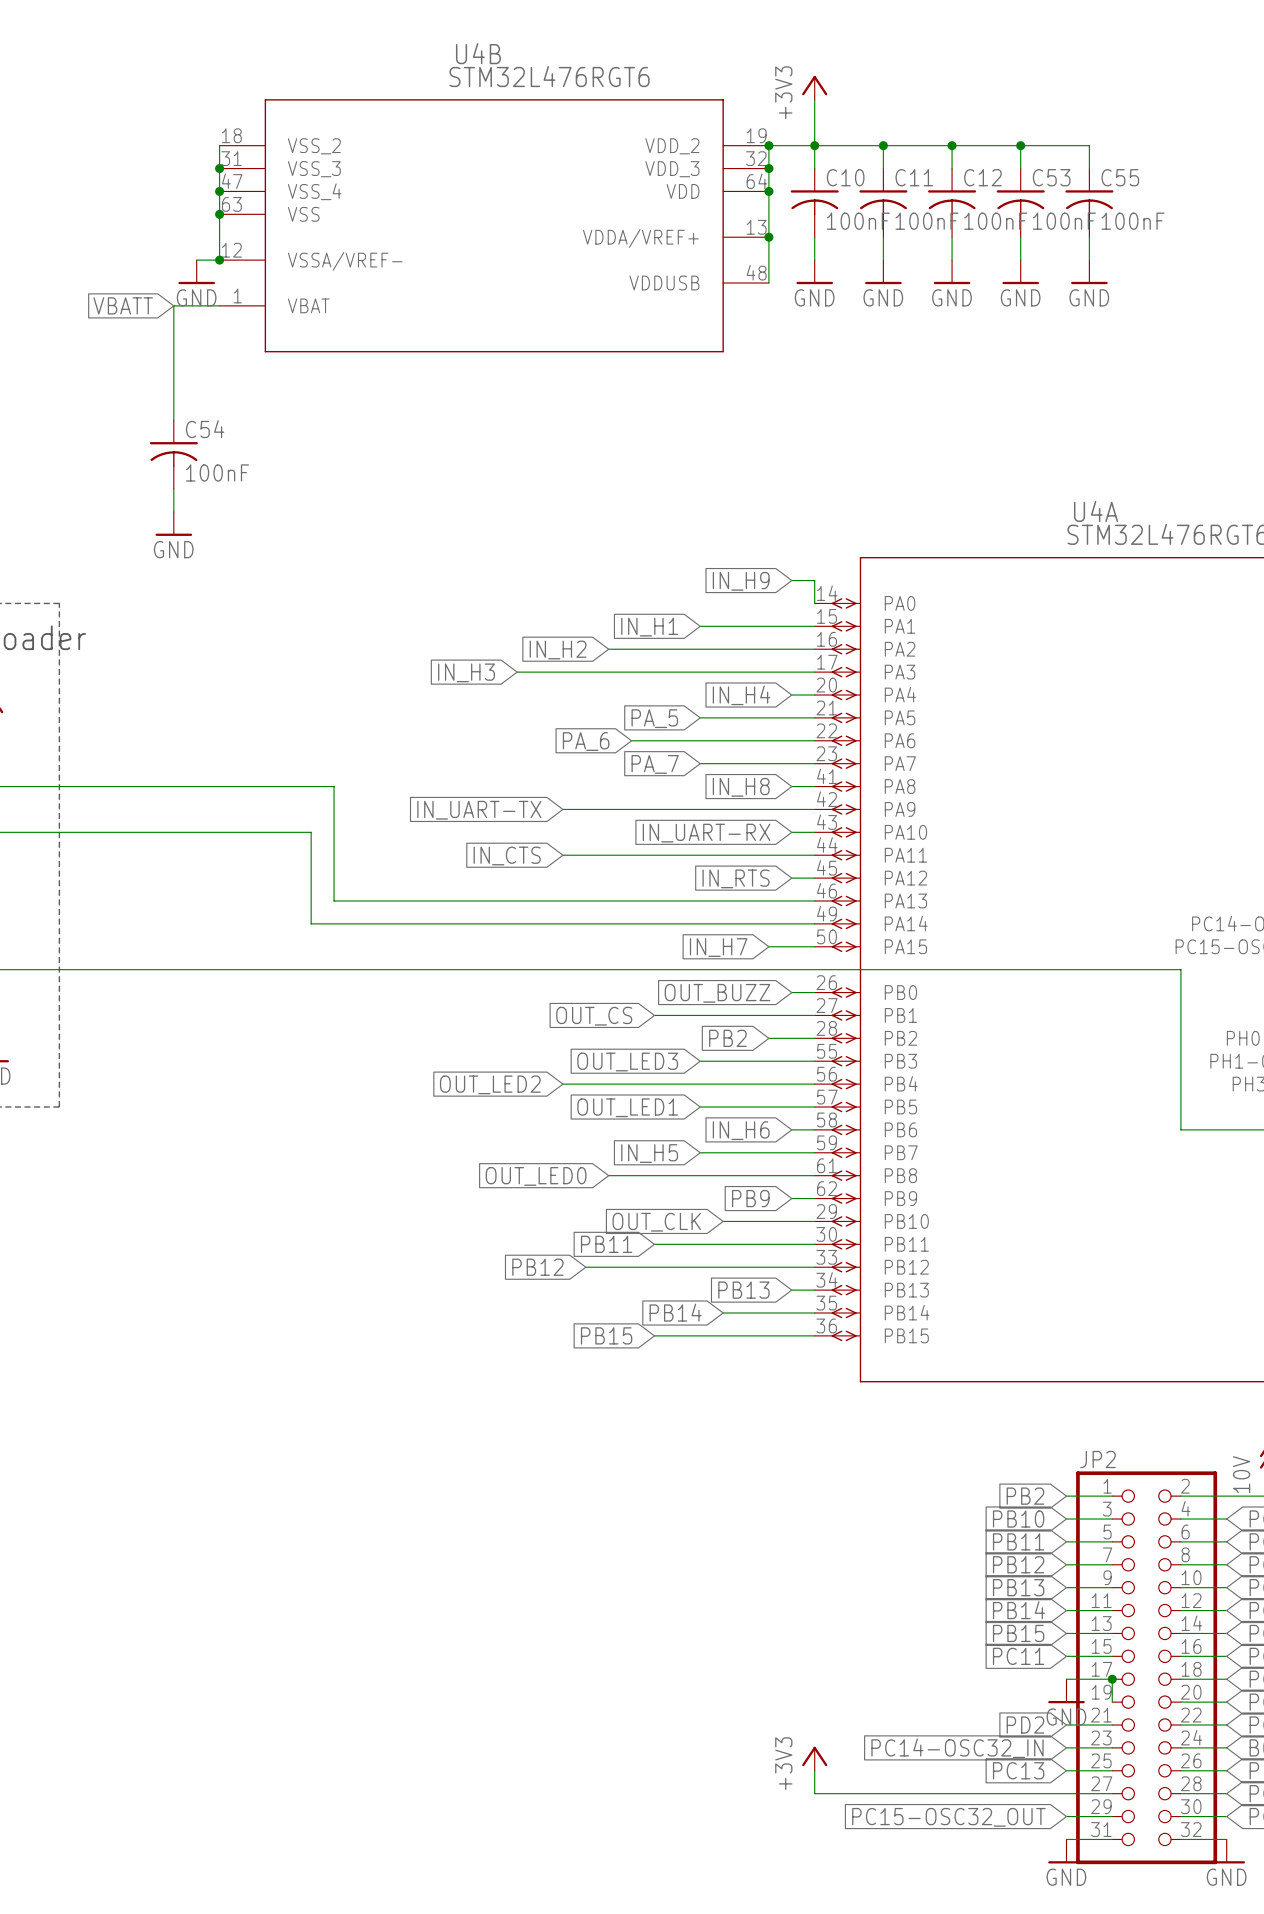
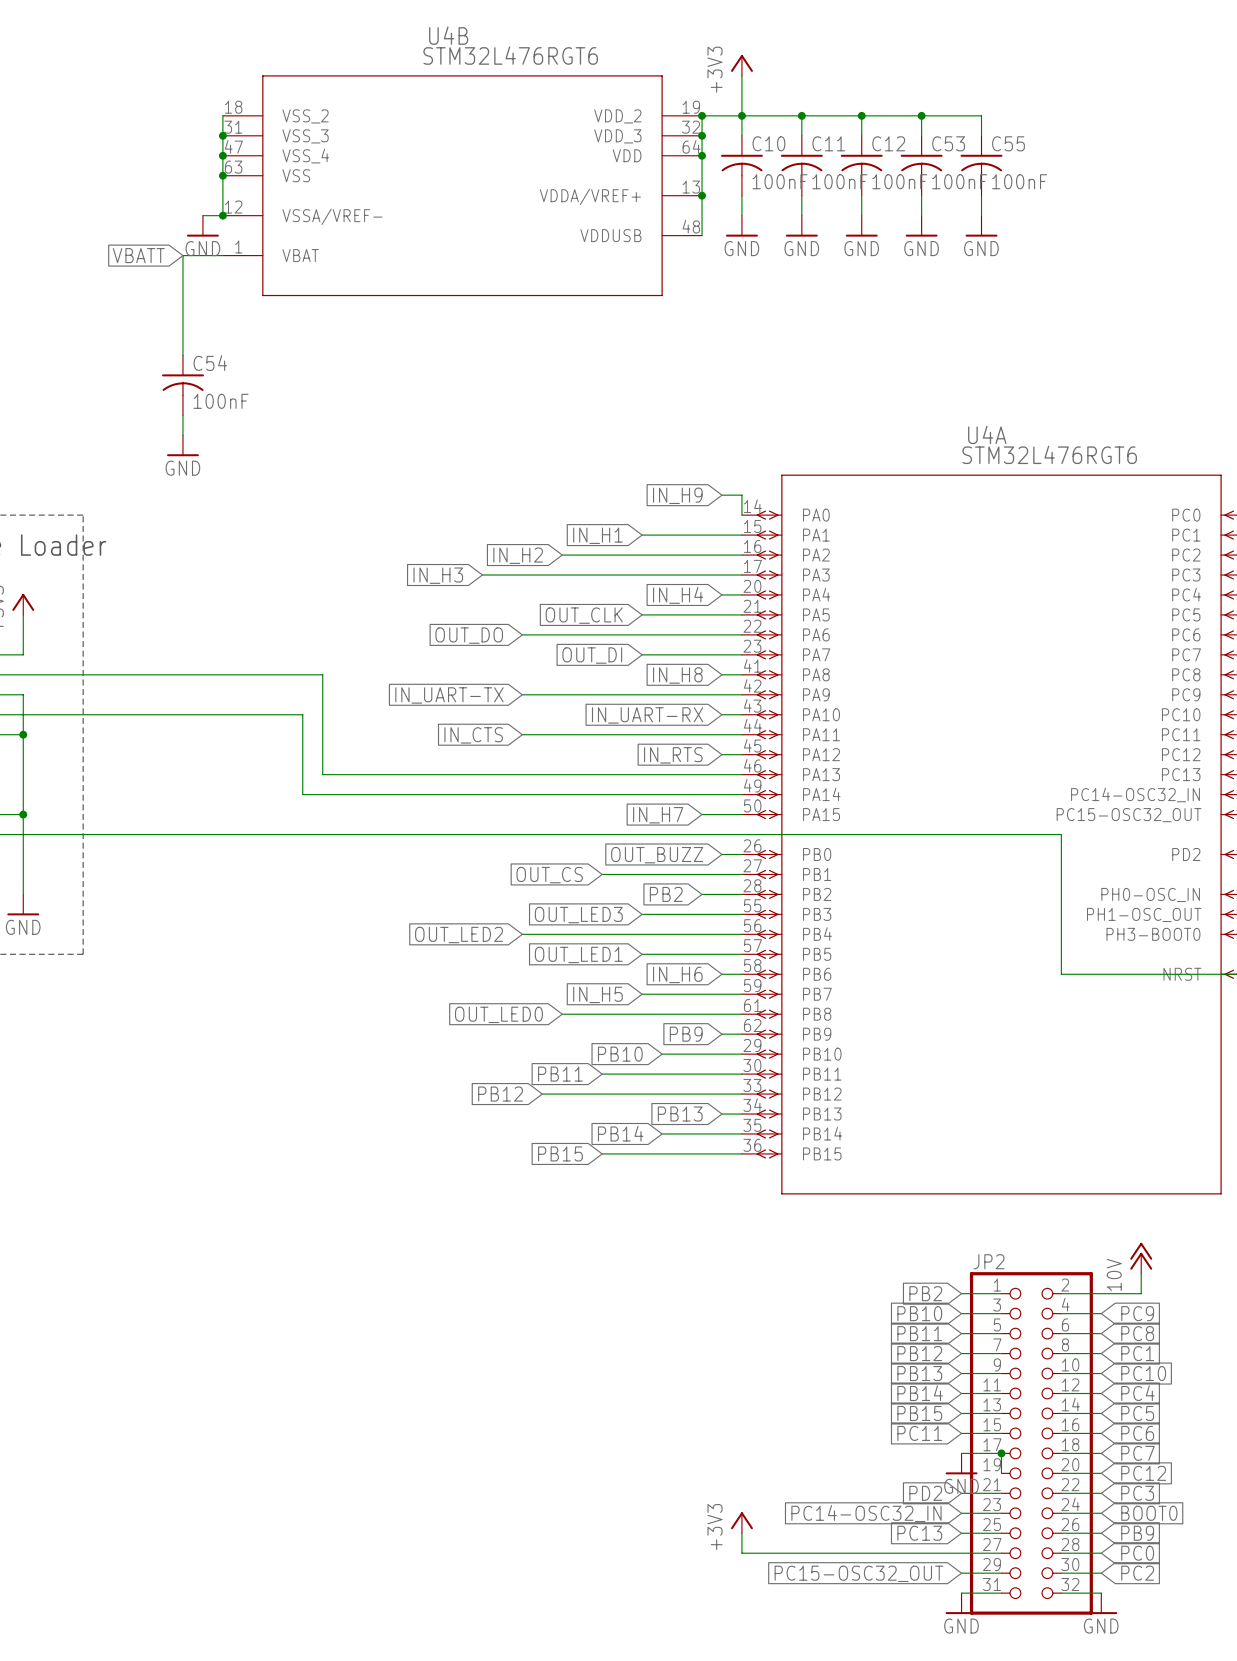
global label: PA_5 (654, 718) -> OUT_CLK (584, 615)
wire: none -> (522, 634) (582, 634)
global label: none -> OUT_DO (469, 635)
global label: PA_6 (586, 741) -> none
global label: PA_7 (655, 764) -> OUT_DI (592, 655)
global label: OUT_CLK (656, 1222) -> PB10 (620, 1054)

